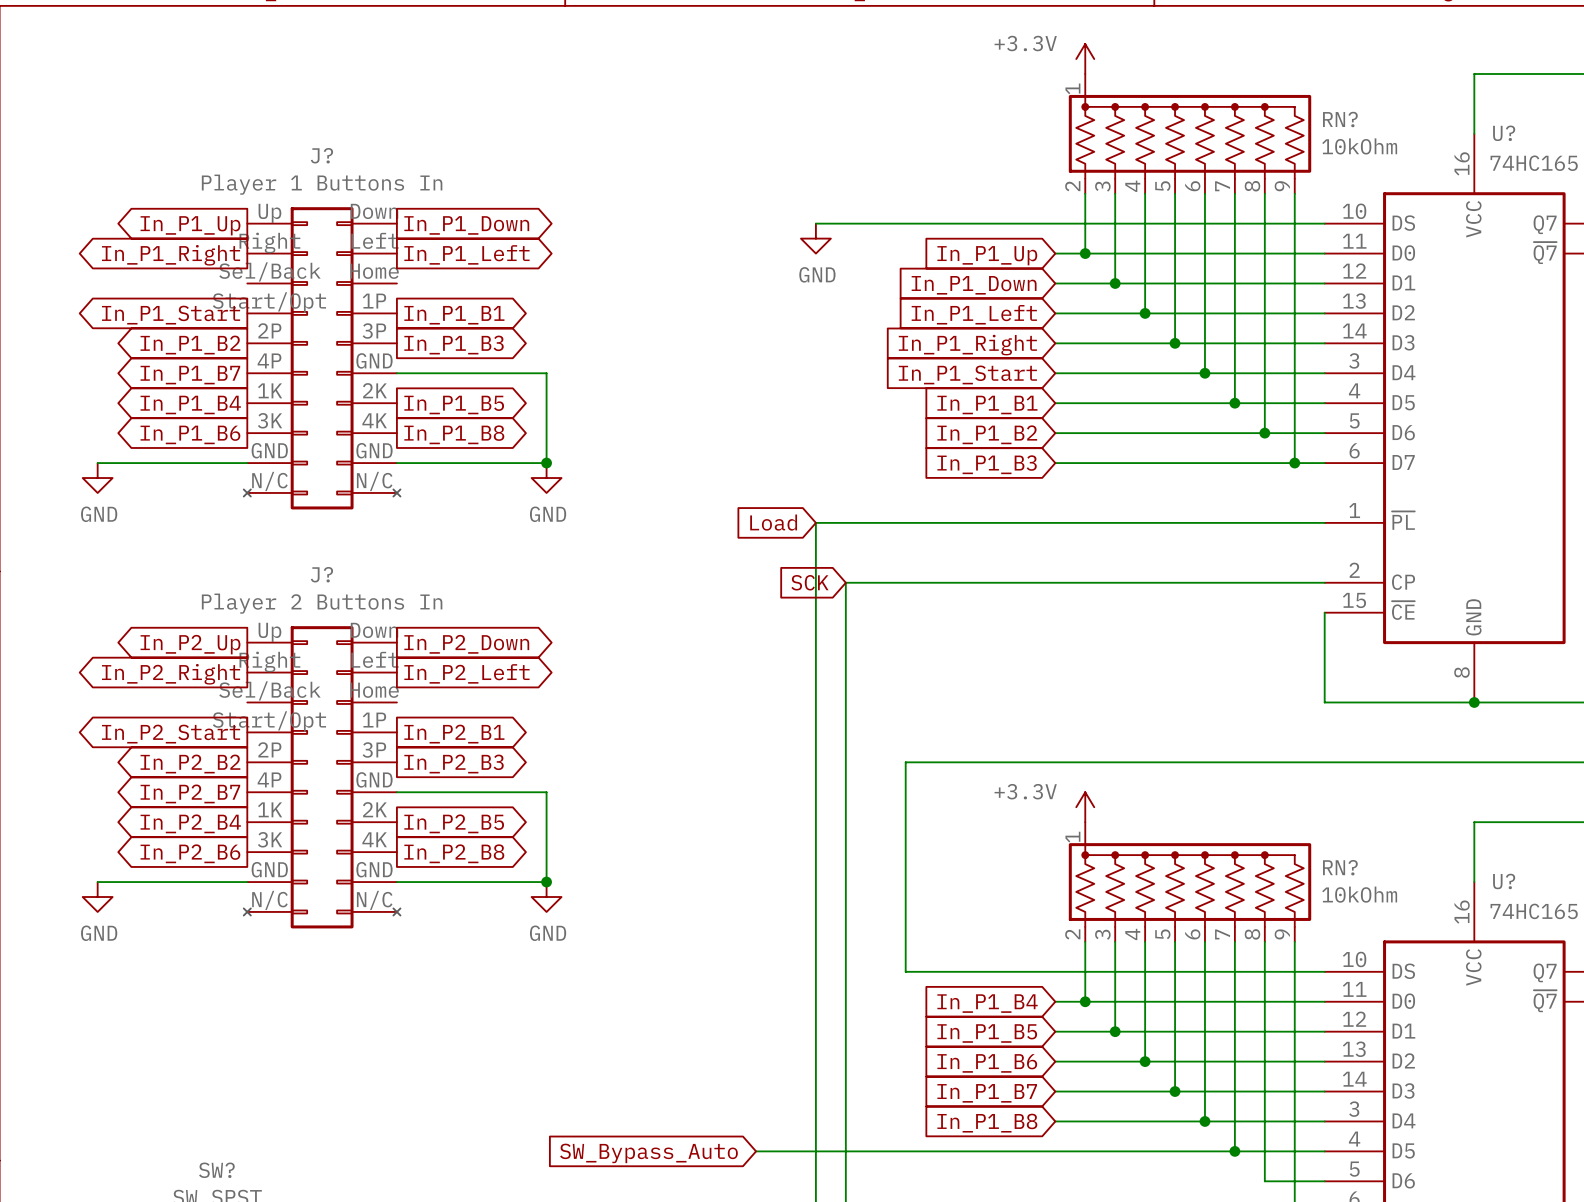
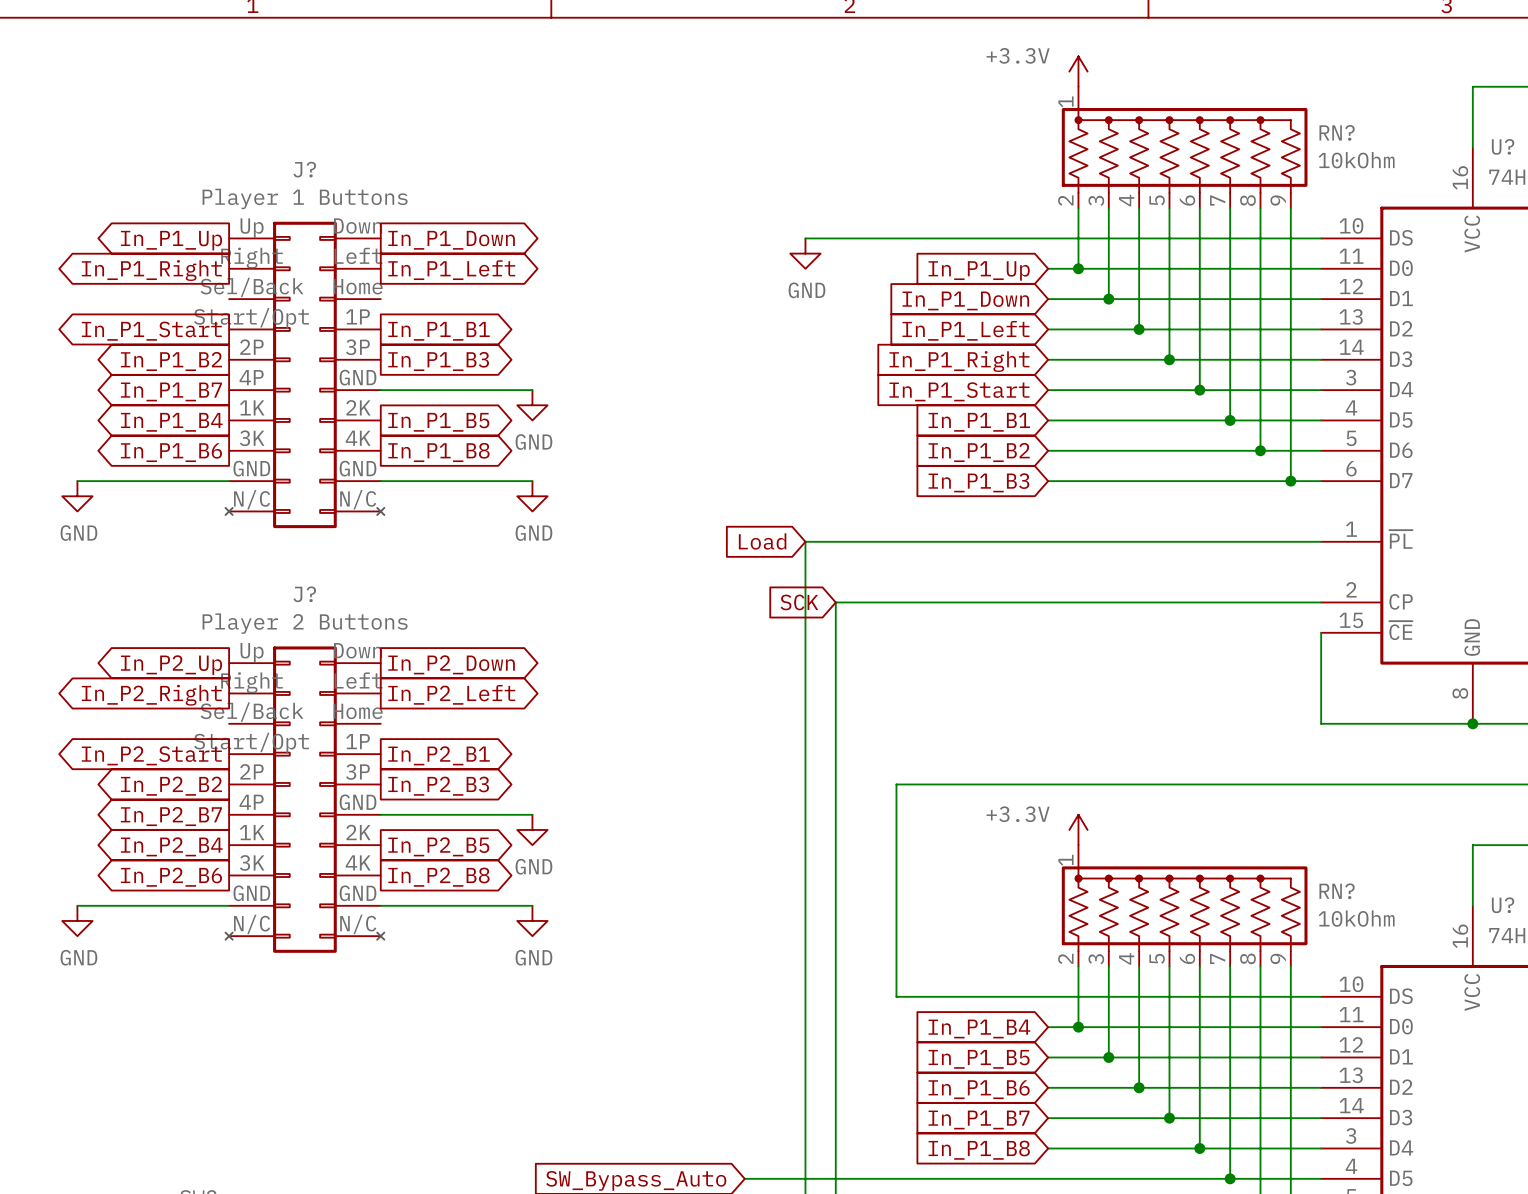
J? value: Player 1 Buttons In (322, 184) -> Player 1 Buttons (305, 198)
wire: (546, 373) (546, 463) -> none
power symbol: none -> GND (532, 405)
junction: (546, 463) -> none
J? value: Player 2 Buttons In (322, 603) -> Player 2 Buttons (305, 623)
wire: (546, 792) (546, 882) -> none
power symbol: none -> GND (532, 829)
junction: (546, 882) -> none

